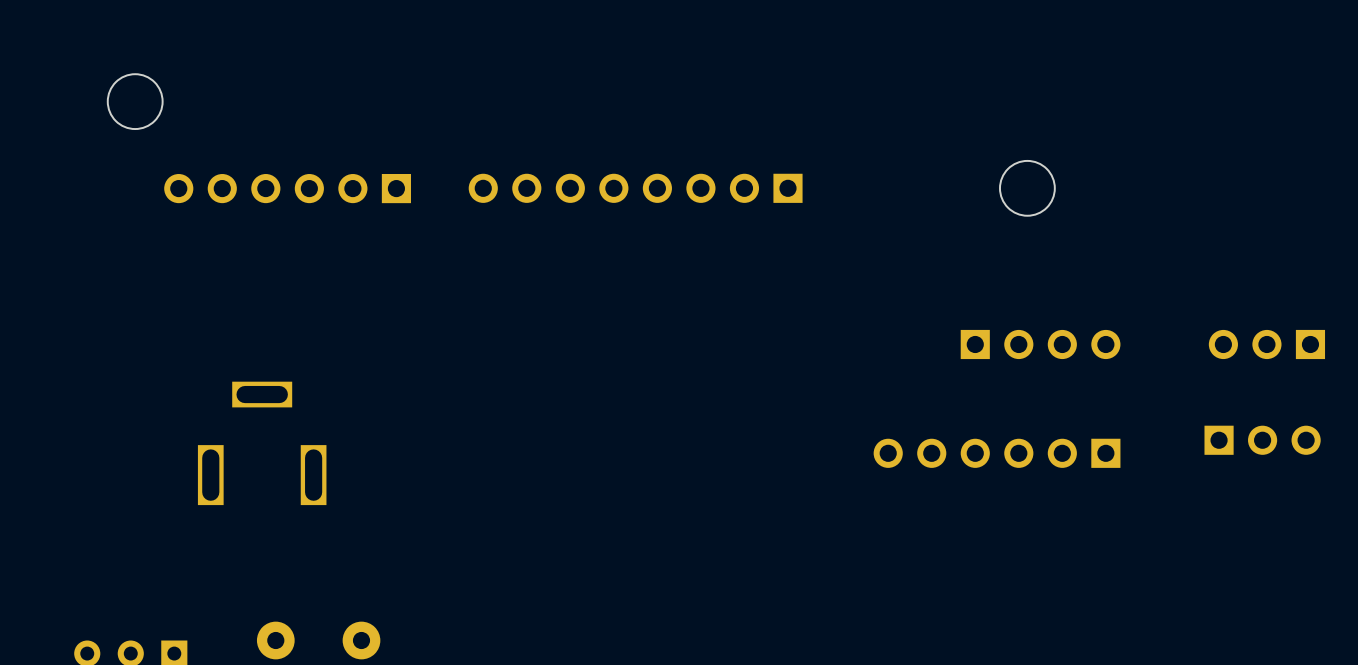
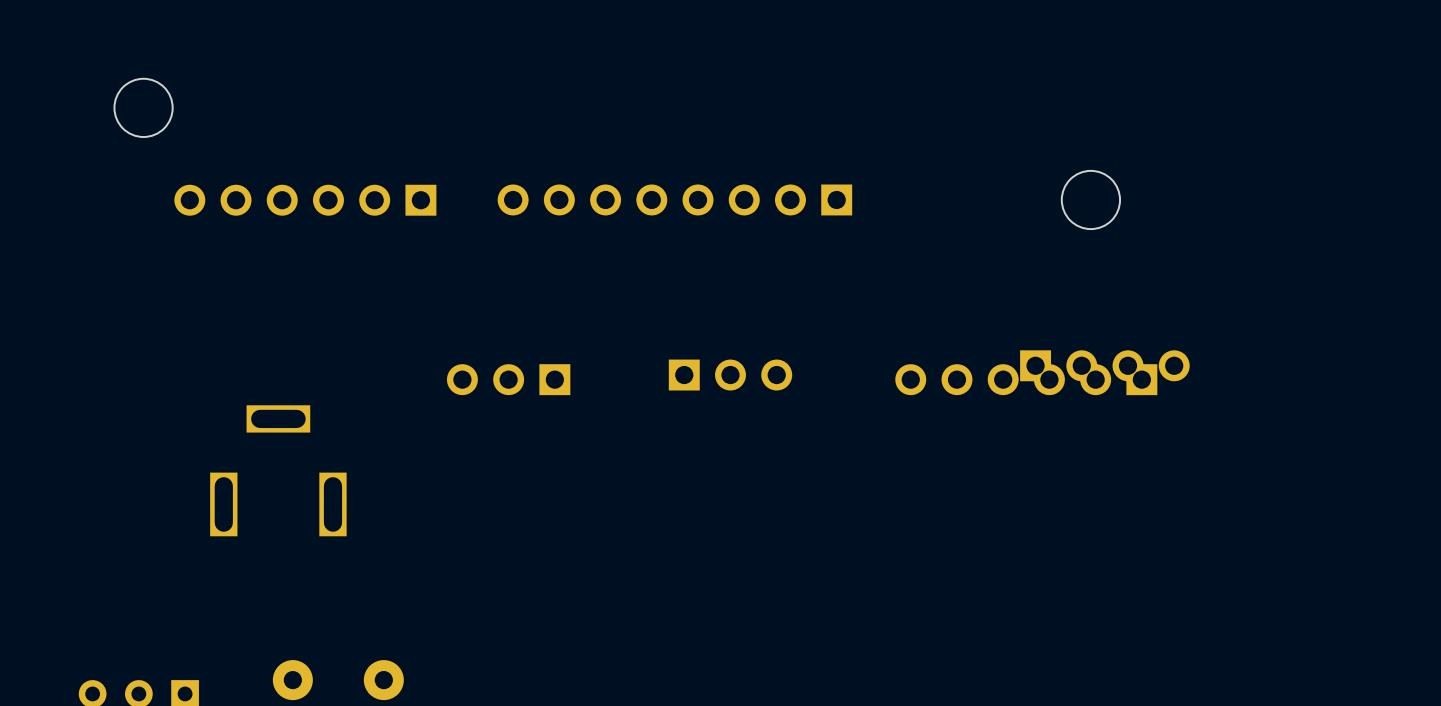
part: (1266, 344) -> none
part: none -> (730, 375)
part: none -> (508, 379)
part: (1262, 440) -> none
part position: (997, 453) -> (1026, 379)

